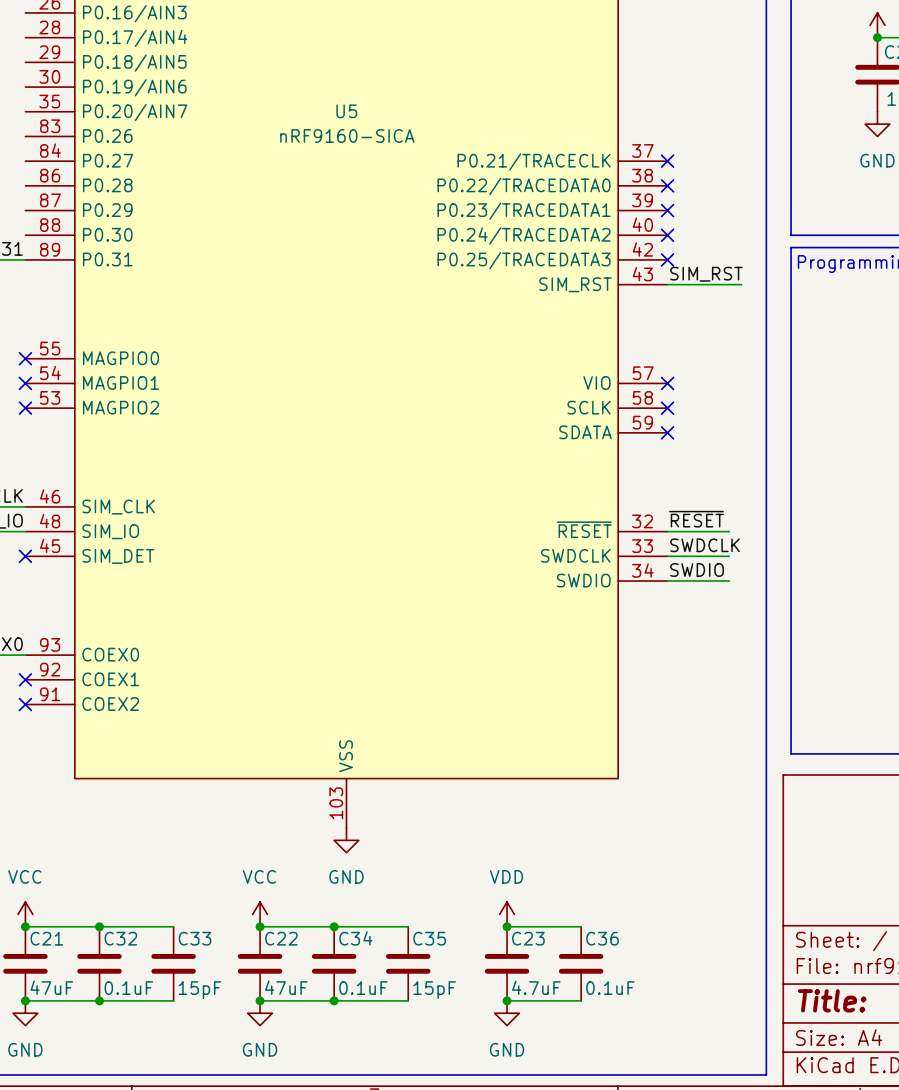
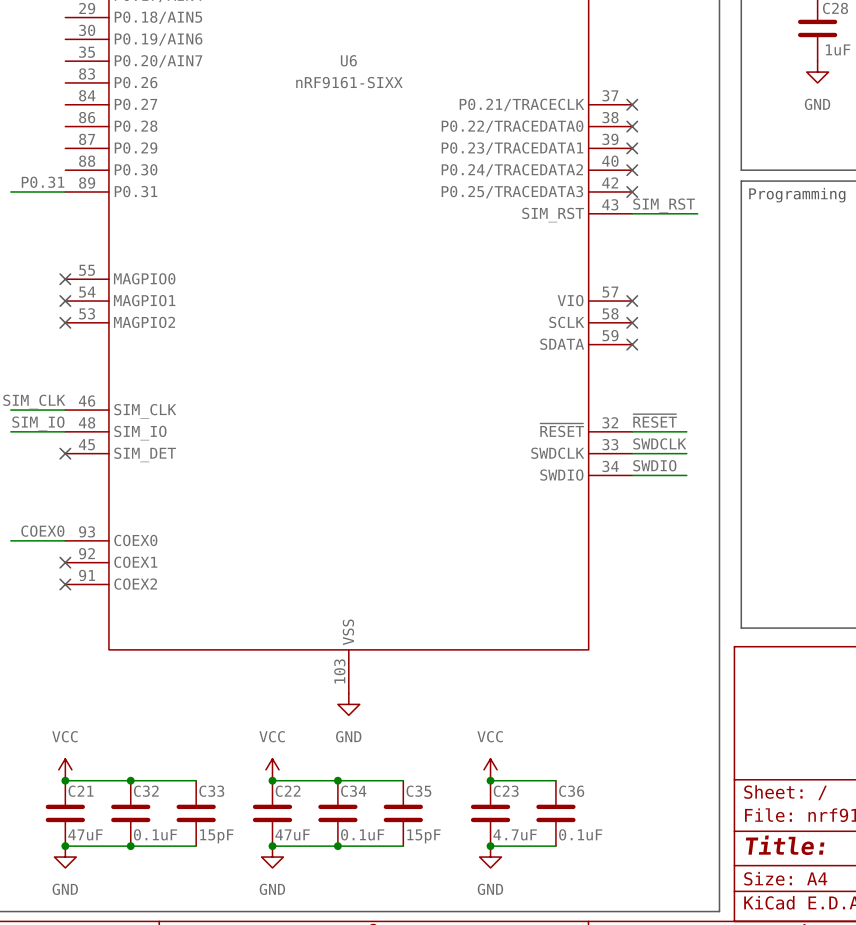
U5 name: U5 (346, 111) -> U6 (348, 60)
U5 value: nRF9160-SICA (347, 135) -> nRF9161-SIXX (349, 82)
power symbol: VDD (507, 914) -> VCC (490, 769)

